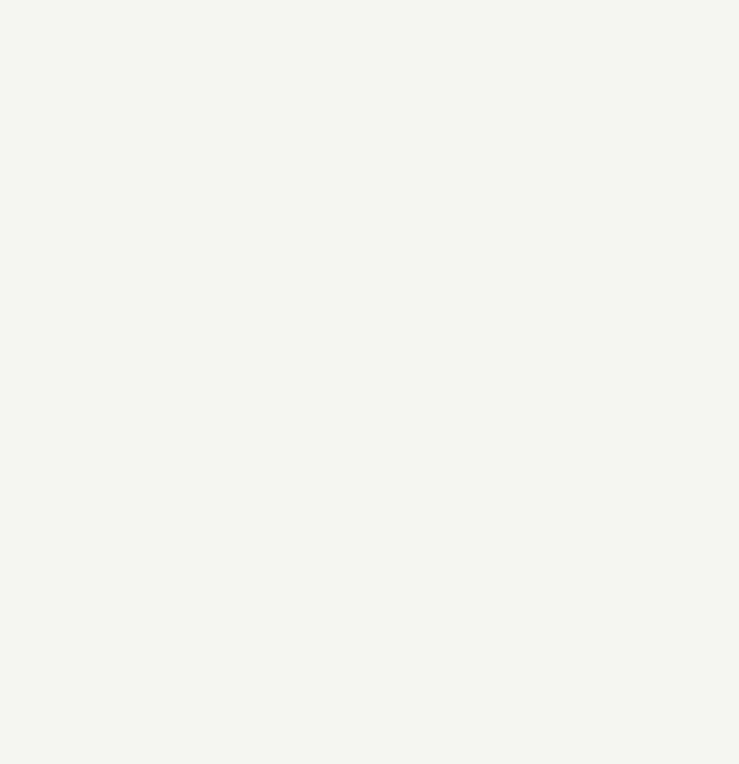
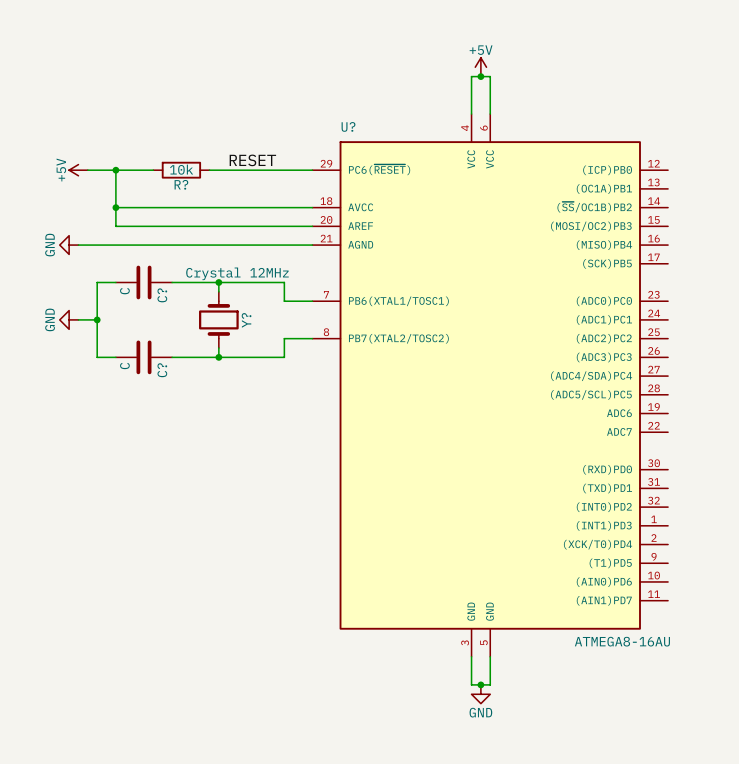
power symbol: none -> +5V (480, 67)
junction: none -> (480, 76)
wire: none -> (471, 114) (471, 76) (490, 76) (490, 114)
label: none -> RESET (252, 160)
power symbol: none -> +5V (78, 170)
wire: none -> (87, 170) (153, 170)
wire: none -> (115, 170) (115, 226) (312, 226)
junction: none -> (115, 170)
R?: none -> 10k (181, 170)
wire: none -> (209, 170) (312, 170)
wire: none -> (115, 207) (312, 207)
junction: none -> (115, 207)
power symbol: none -> GND (69, 245)
wire: none -> (78, 245) (312, 245)
wire: none -> (115, 282) (97, 282) (97, 357) (115, 357)
C?: none -> C (143, 282)
wire: none -> (172, 282) (284, 282) (284, 301) (312, 301)
wire: none -> (218, 282) (218, 291)
junction: none -> (218, 282)
power symbol: none -> GND (69, 319)
wire: none -> (78, 319) (97, 319)
junction: none -> (97, 319)
Y?: none -> Crystal 12MHz (218, 319)
wire: none -> (312, 338) (284, 338) (284, 357) (172, 357)
wire: none -> (218, 348) (218, 357)
C?: none -> C (143, 357)
junction: none -> (218, 357)
U?: none -> ATMEGA8-16AU (490, 385)
wire: none -> (471, 656) (471, 684) (490, 684) (490, 656)
junction: none -> (480, 684)
power symbol: none -> GND (480, 694)

